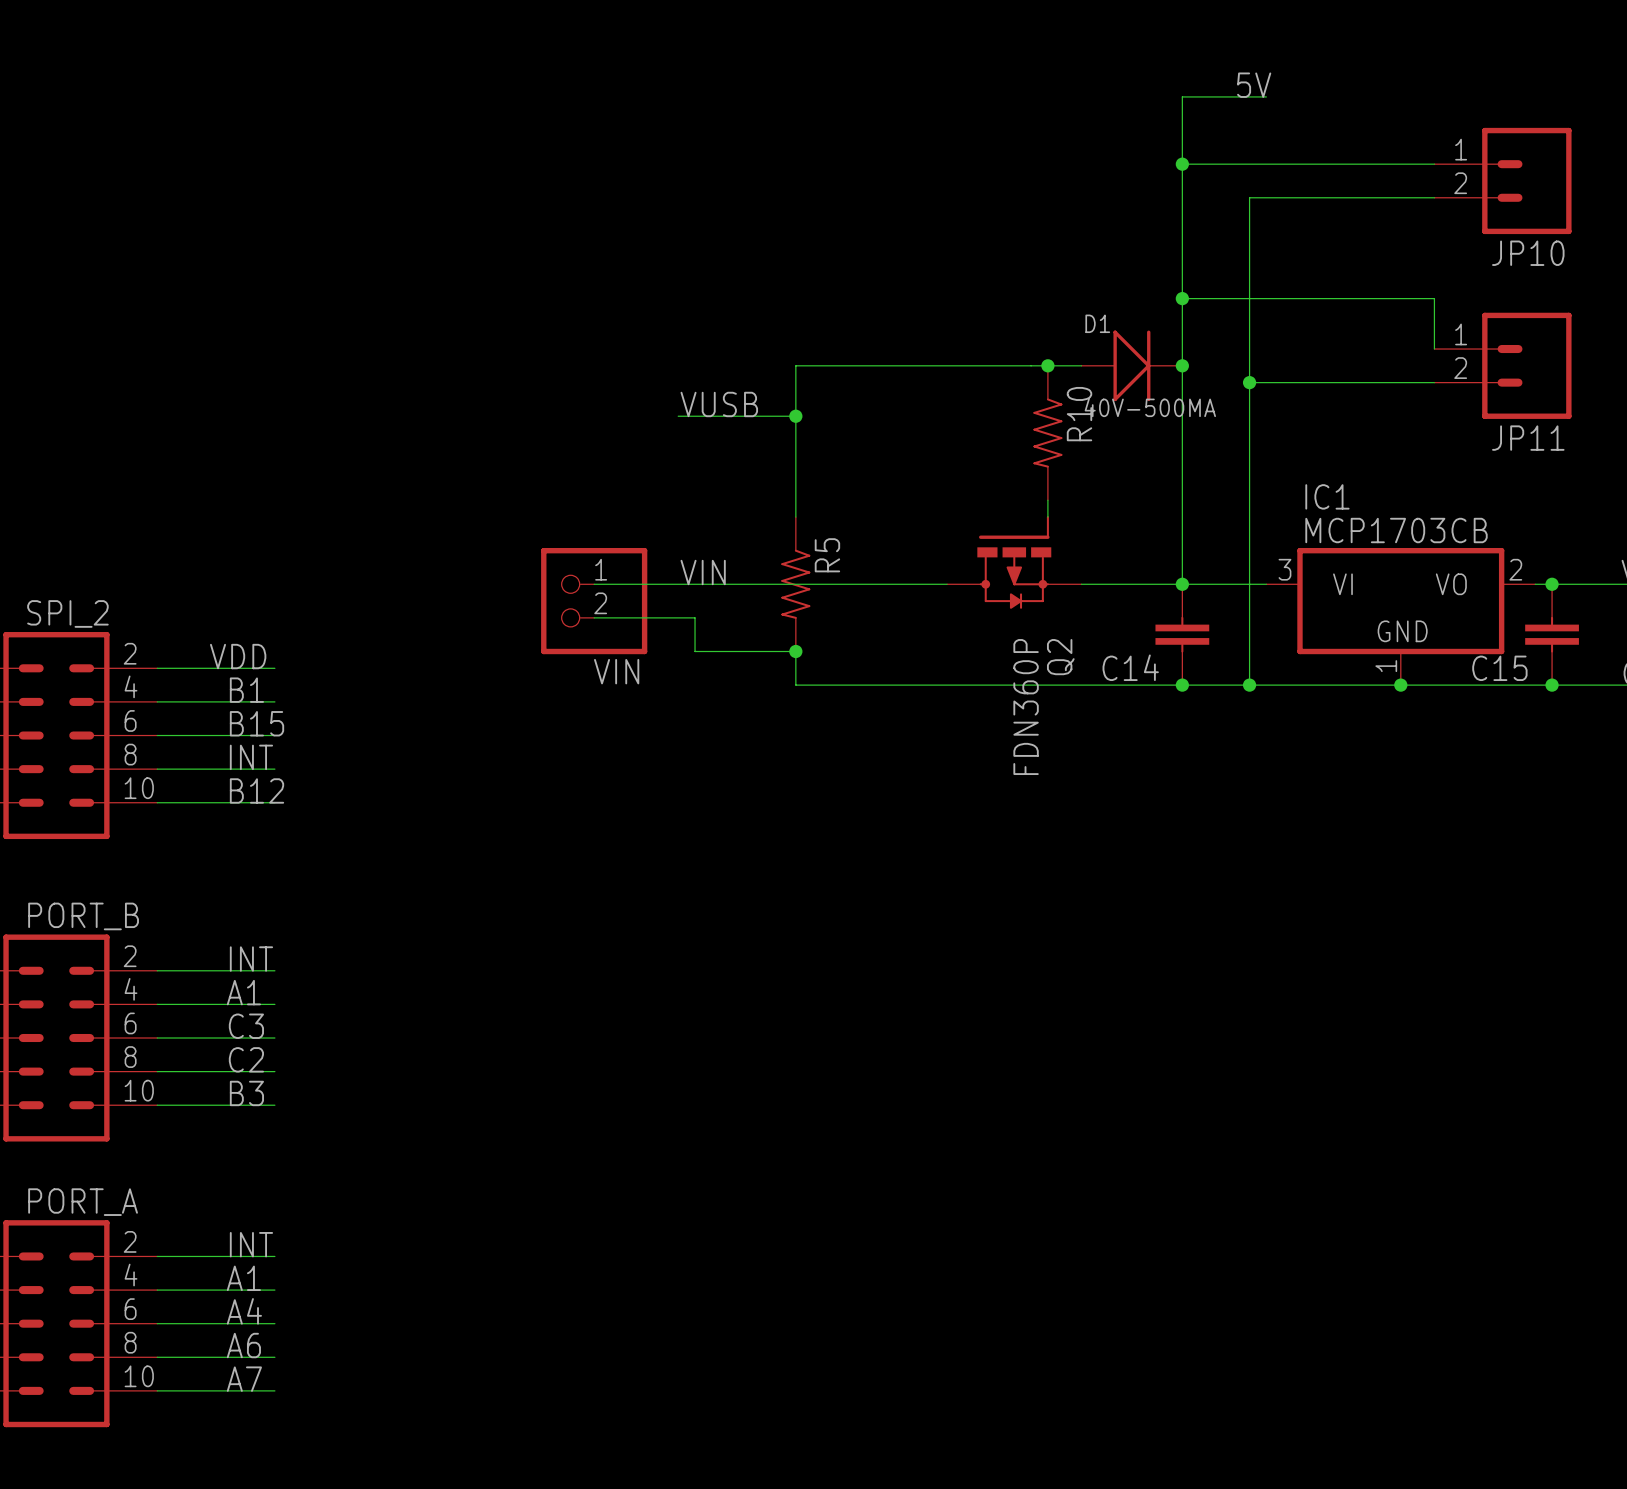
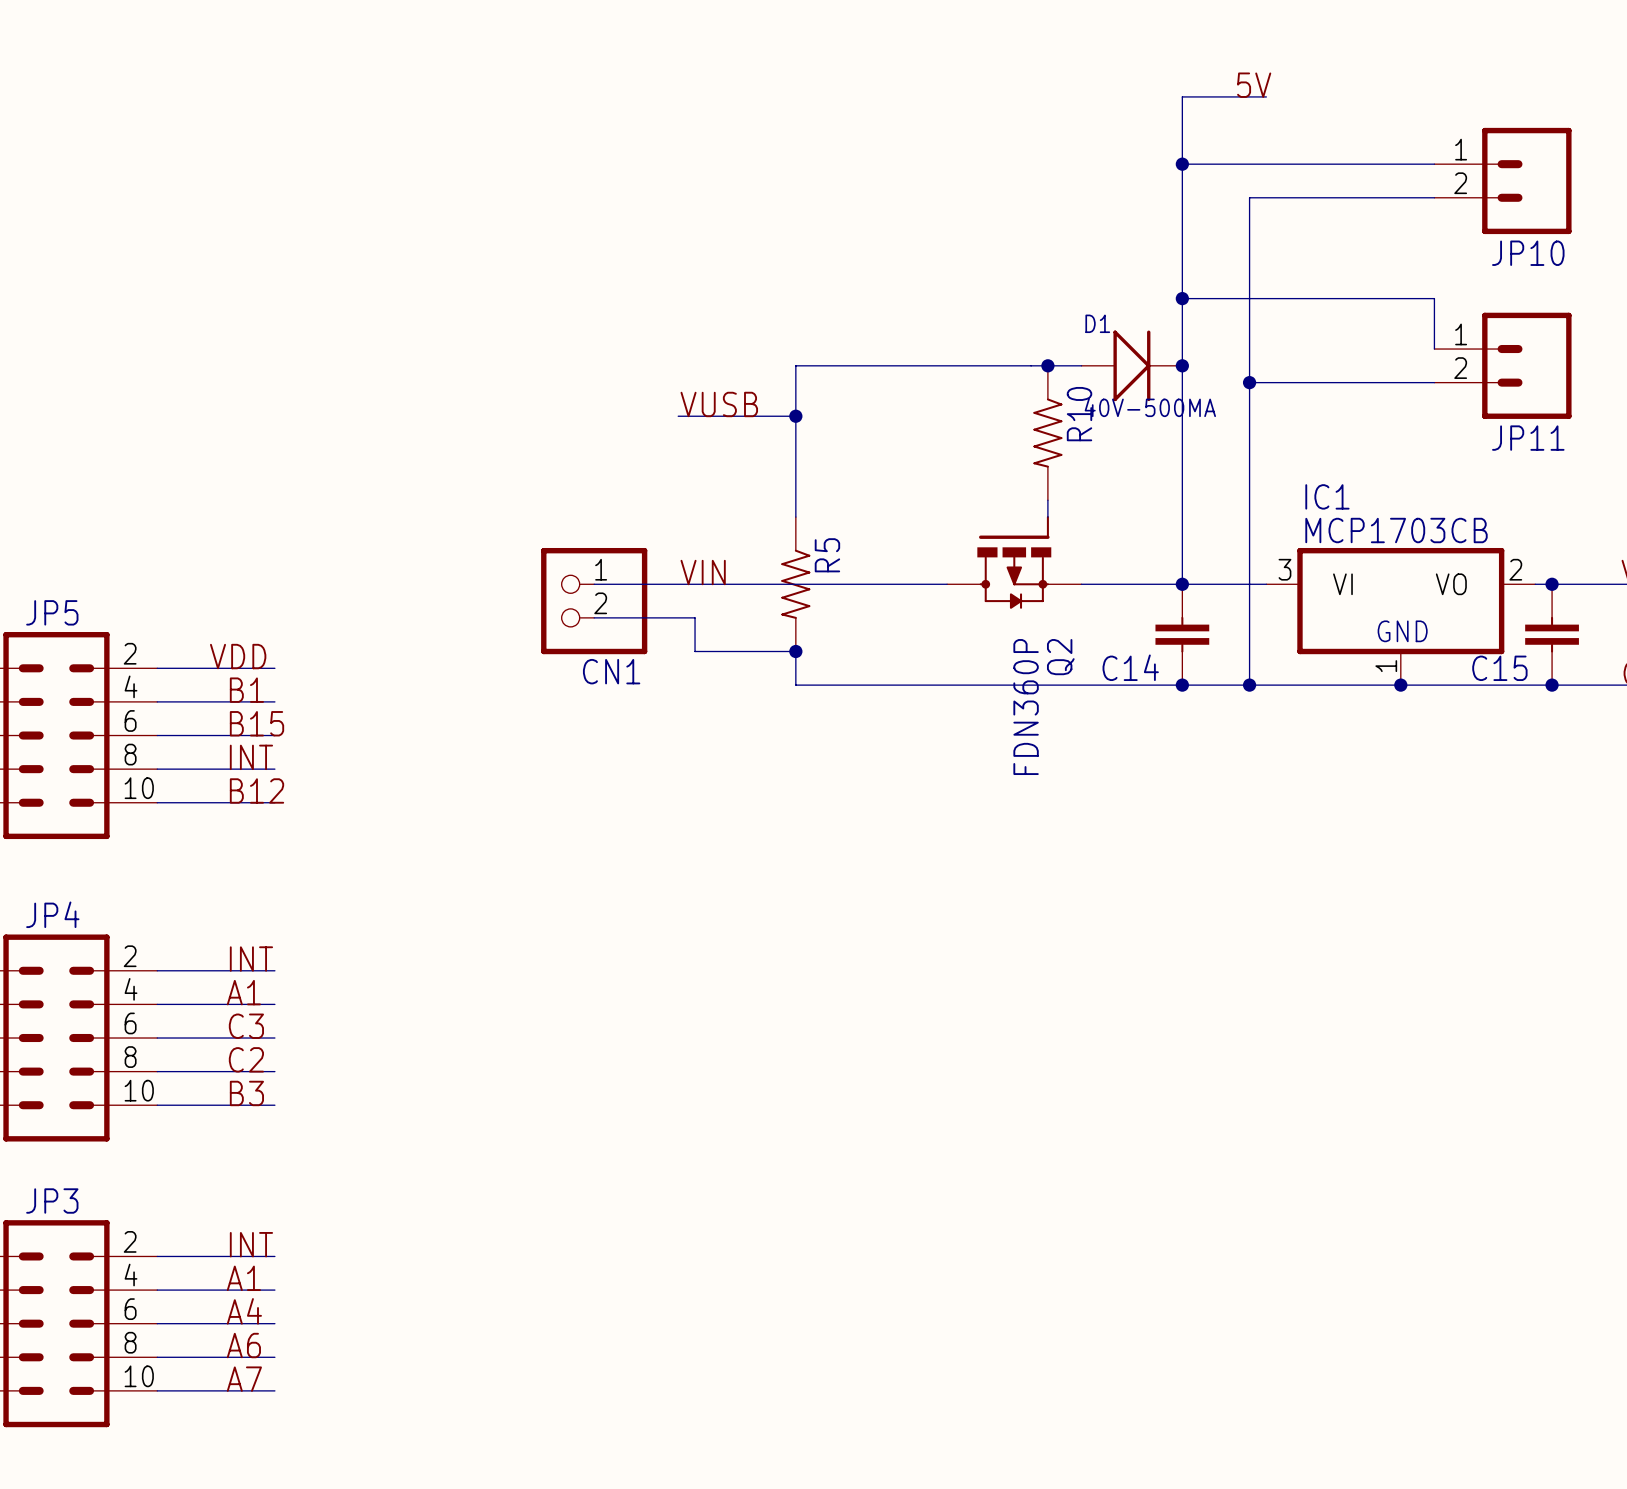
SPI_2 name: SPI_2 (67, 613) -> JP5 (52, 612)
VIN name: VIN (616, 671) -> CN1 (611, 671)
PORT_B name: PORT_B (83, 916) -> JP4 (52, 914)
PORT_A name: PORT_A (83, 1202) -> JP3 (52, 1201)

